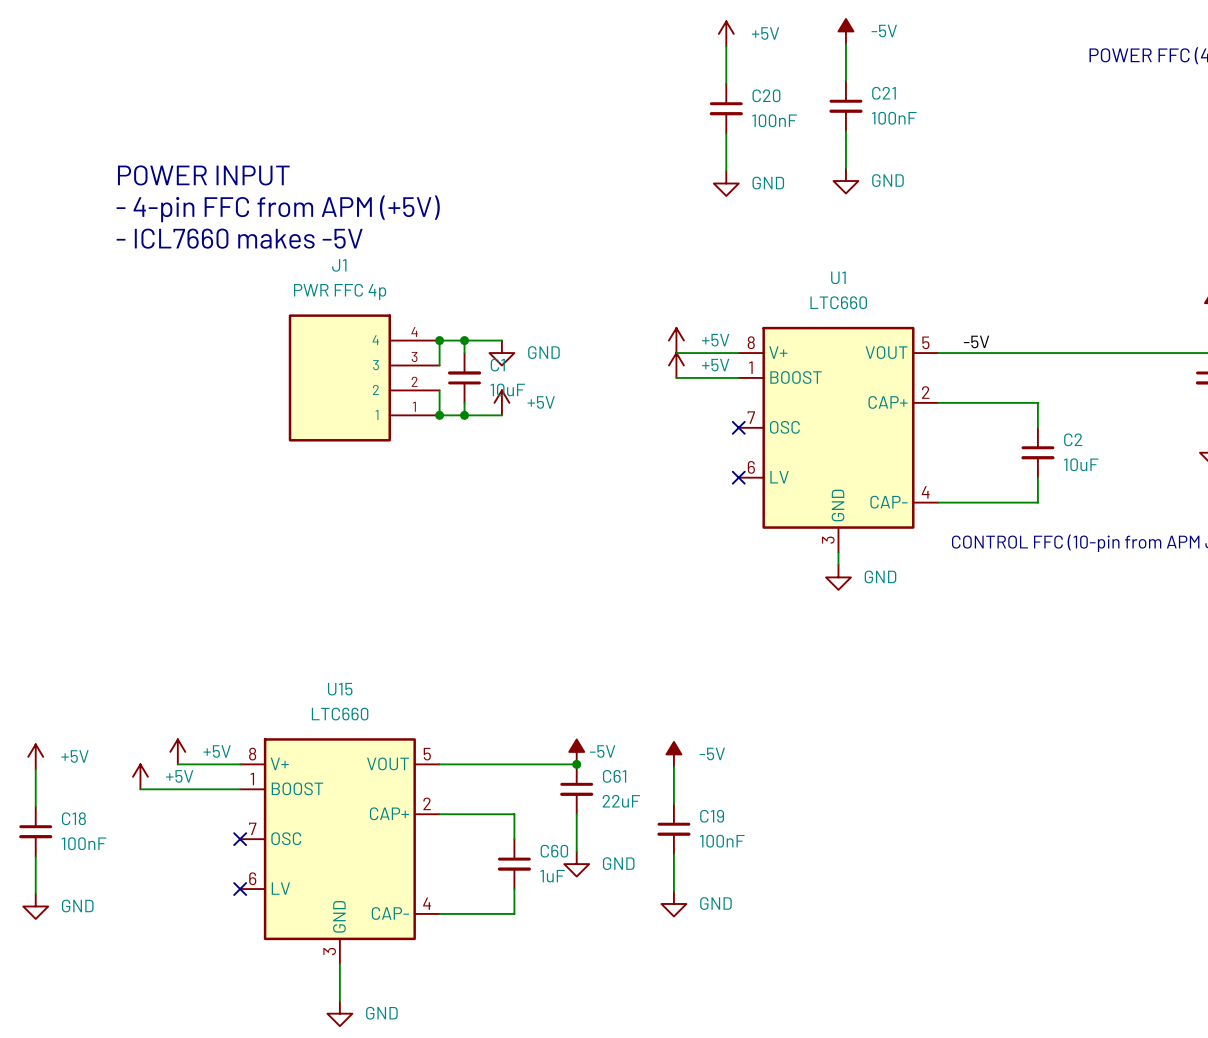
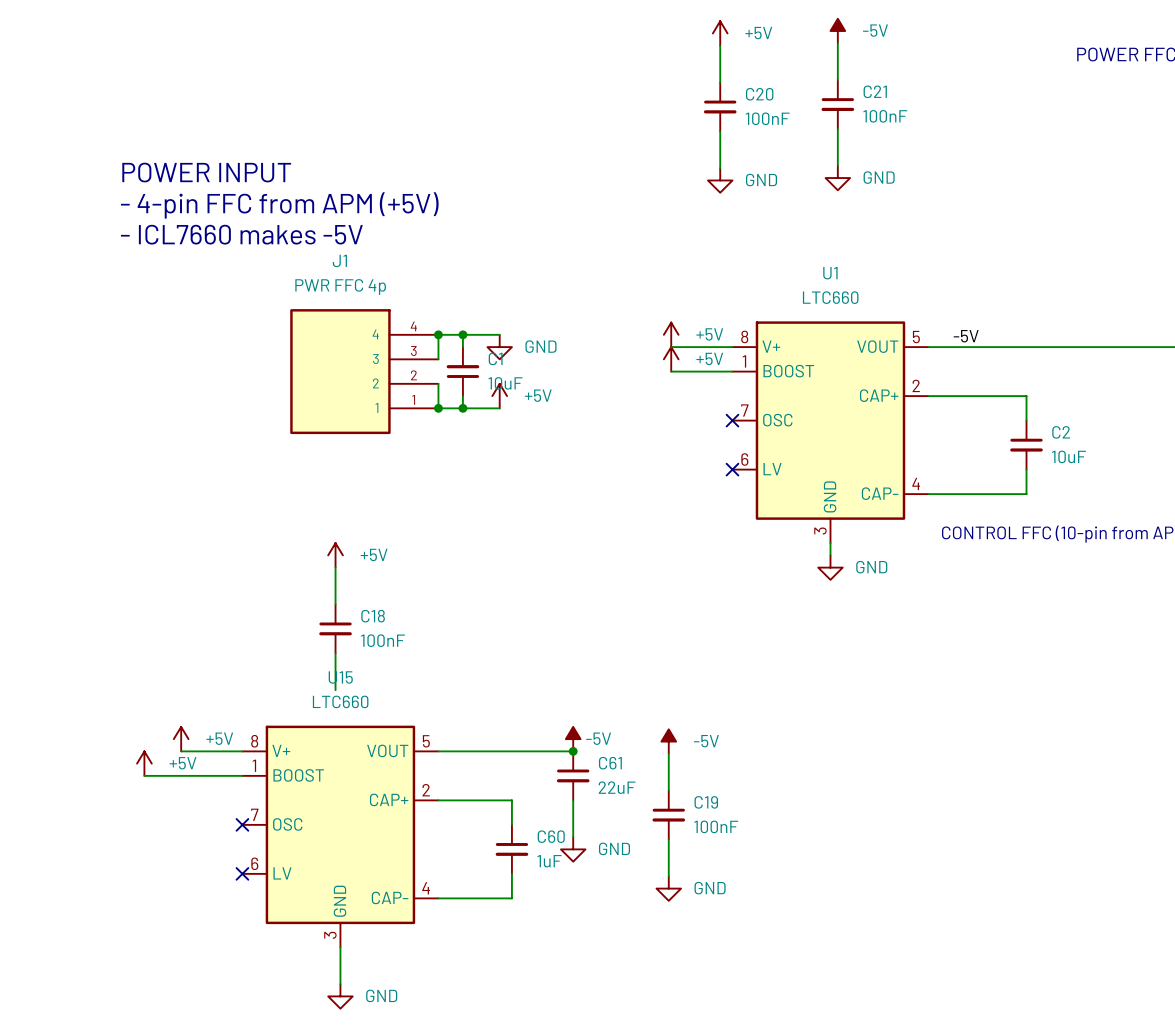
power symbol: none -> +5V (335, 555)
wire: none -> (335, 567) (335, 604)
wire: none -> (335, 653) (335, 690)
power symbol: +5V (35, 756) -> none
wire: (35, 769) (35, 806) -> none
C18 position: (35, 831) -> (335, 628)
wire: (35, 856) (35, 894) -> none
power symbol: GND (35, 906) -> none

